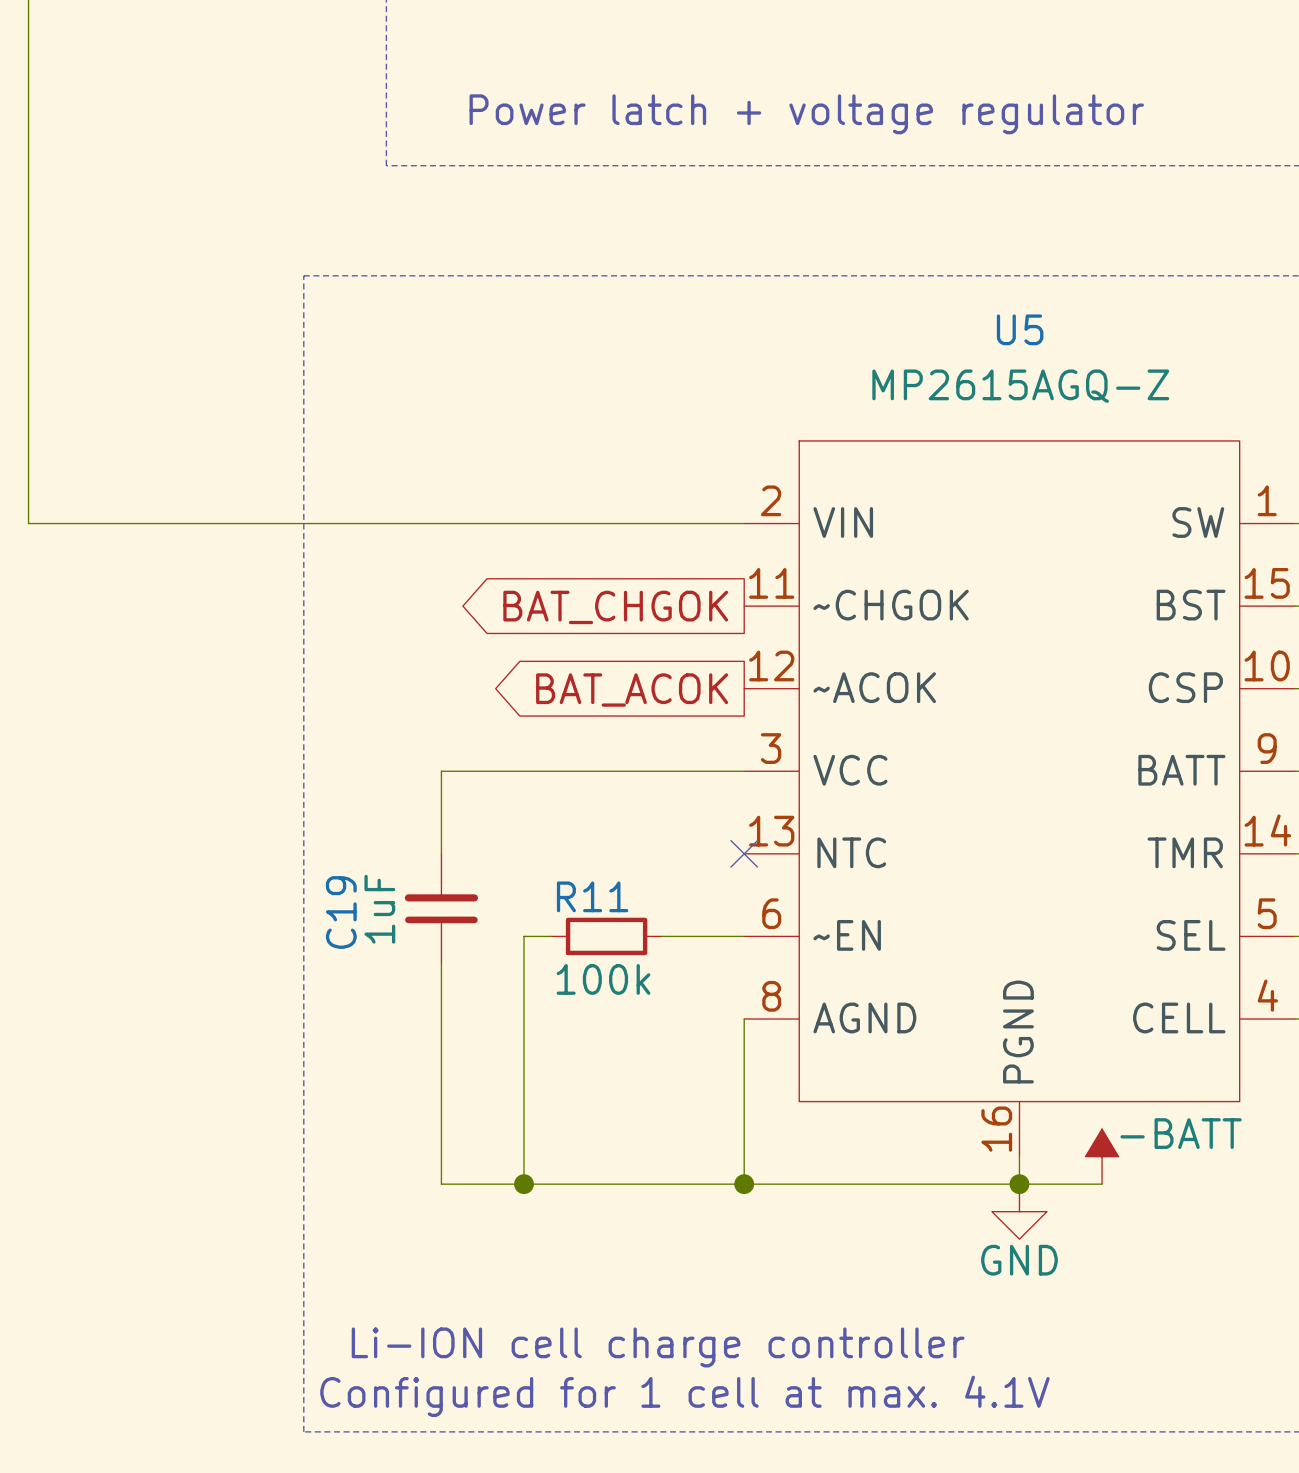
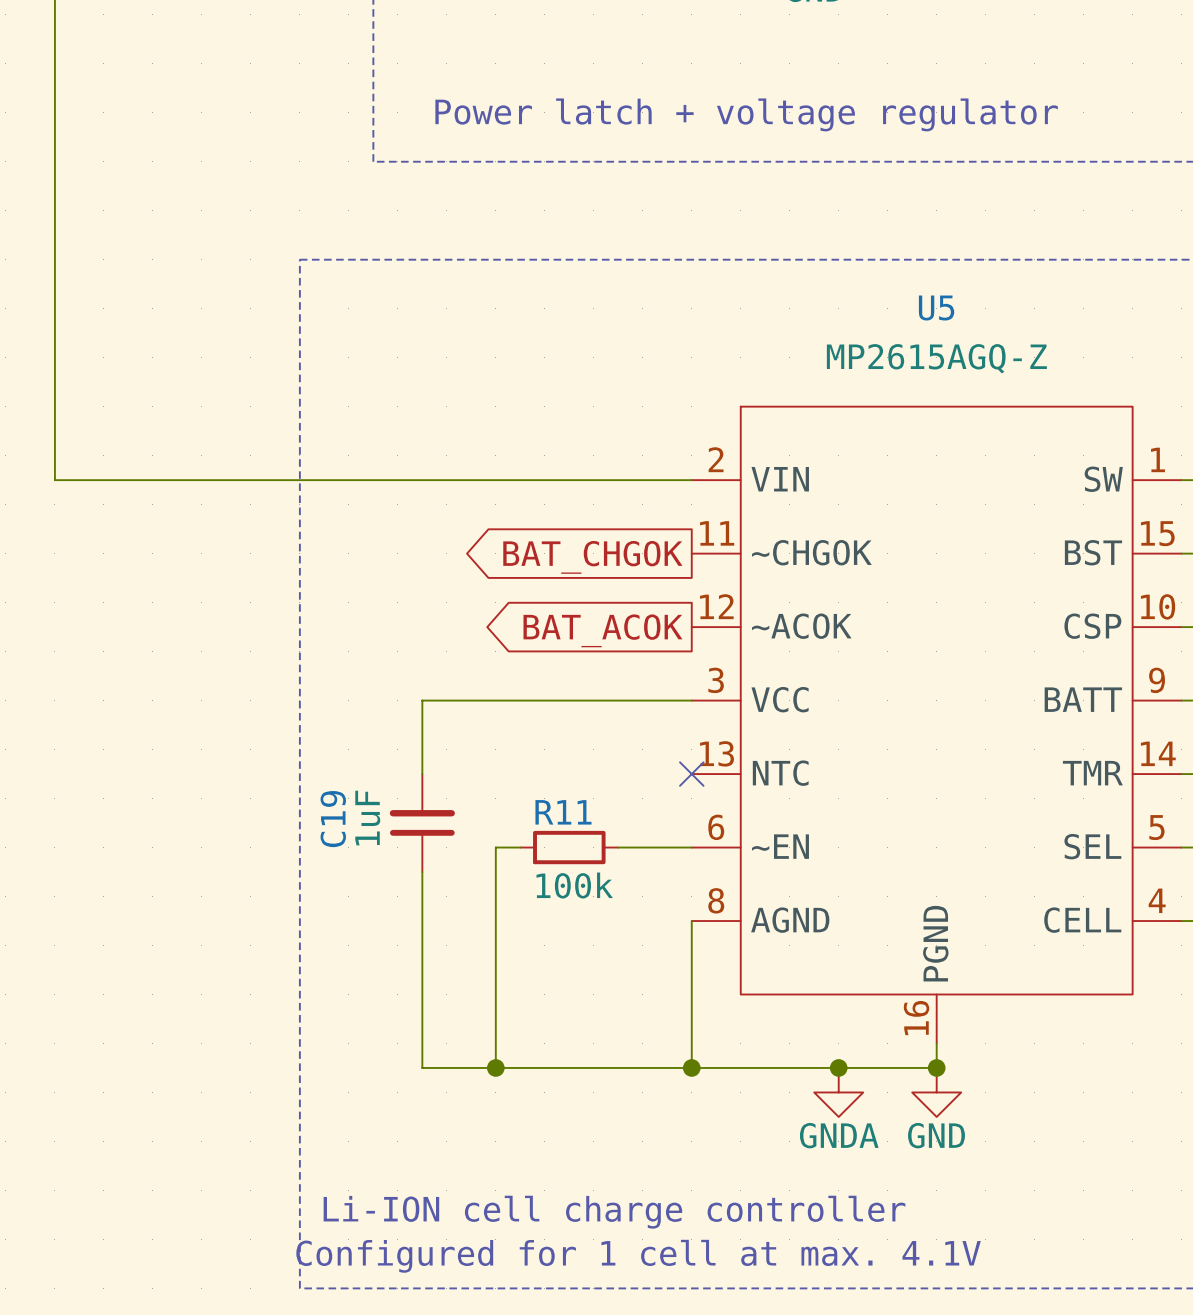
power symbol: -BATT (1102, 1156) -> none
junction: none -> (838, 1067)
wire: (1019, 1184) (1102, 1184) -> none
power symbol: none -> GNDA (838, 1092)

